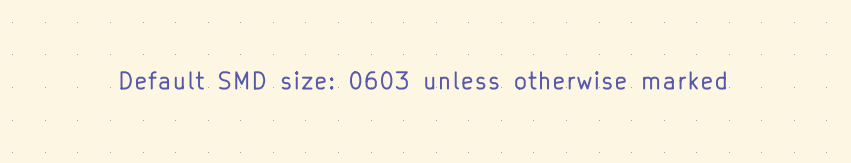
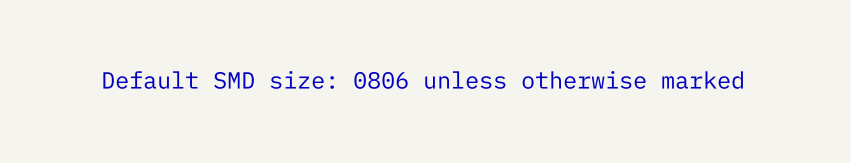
text: Default SMD size: 0603 unless otherwise marked (423, 80) -> Default SMD size: 0806 unless otherwise marked (423, 79)

